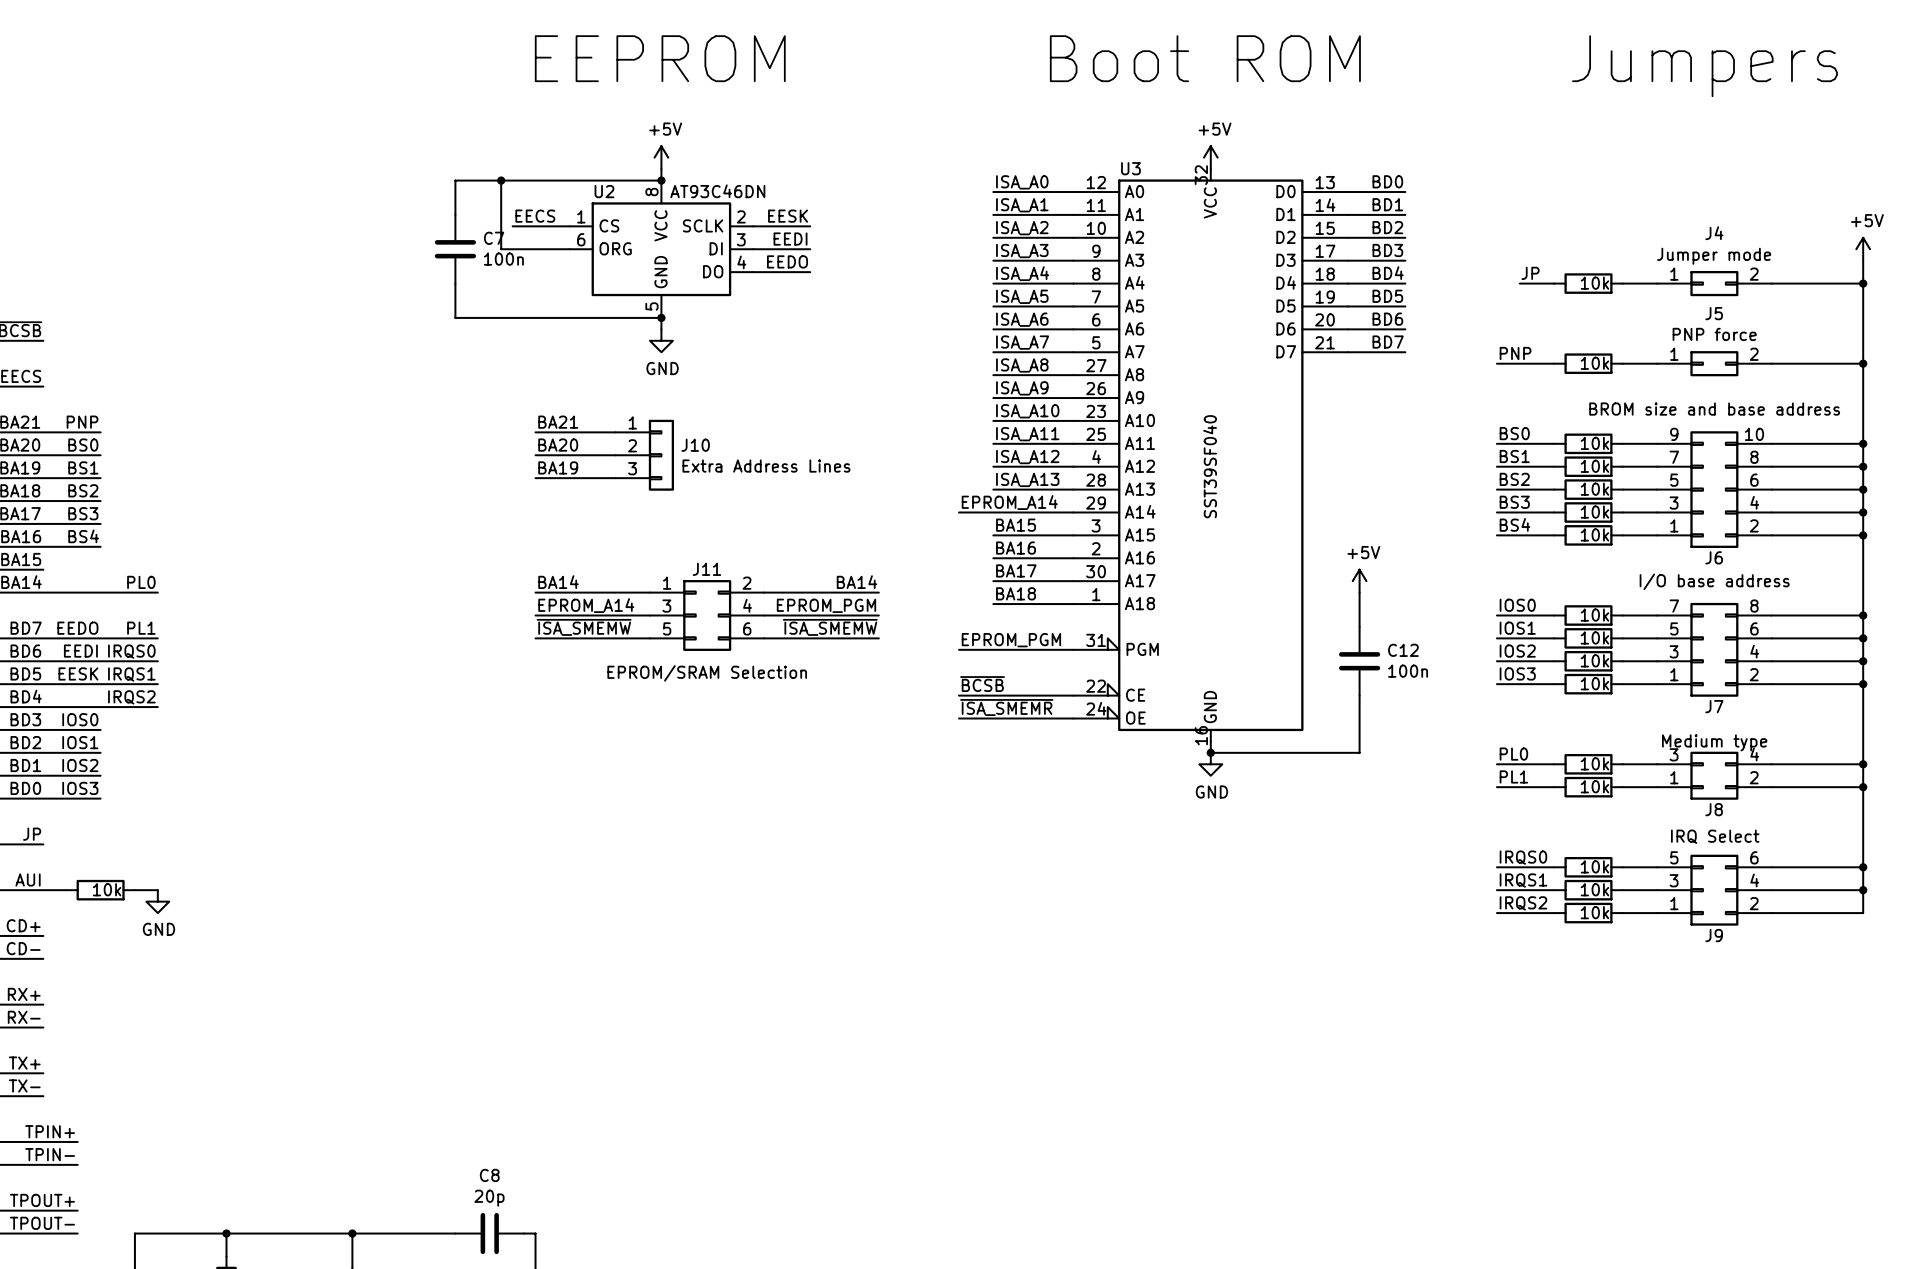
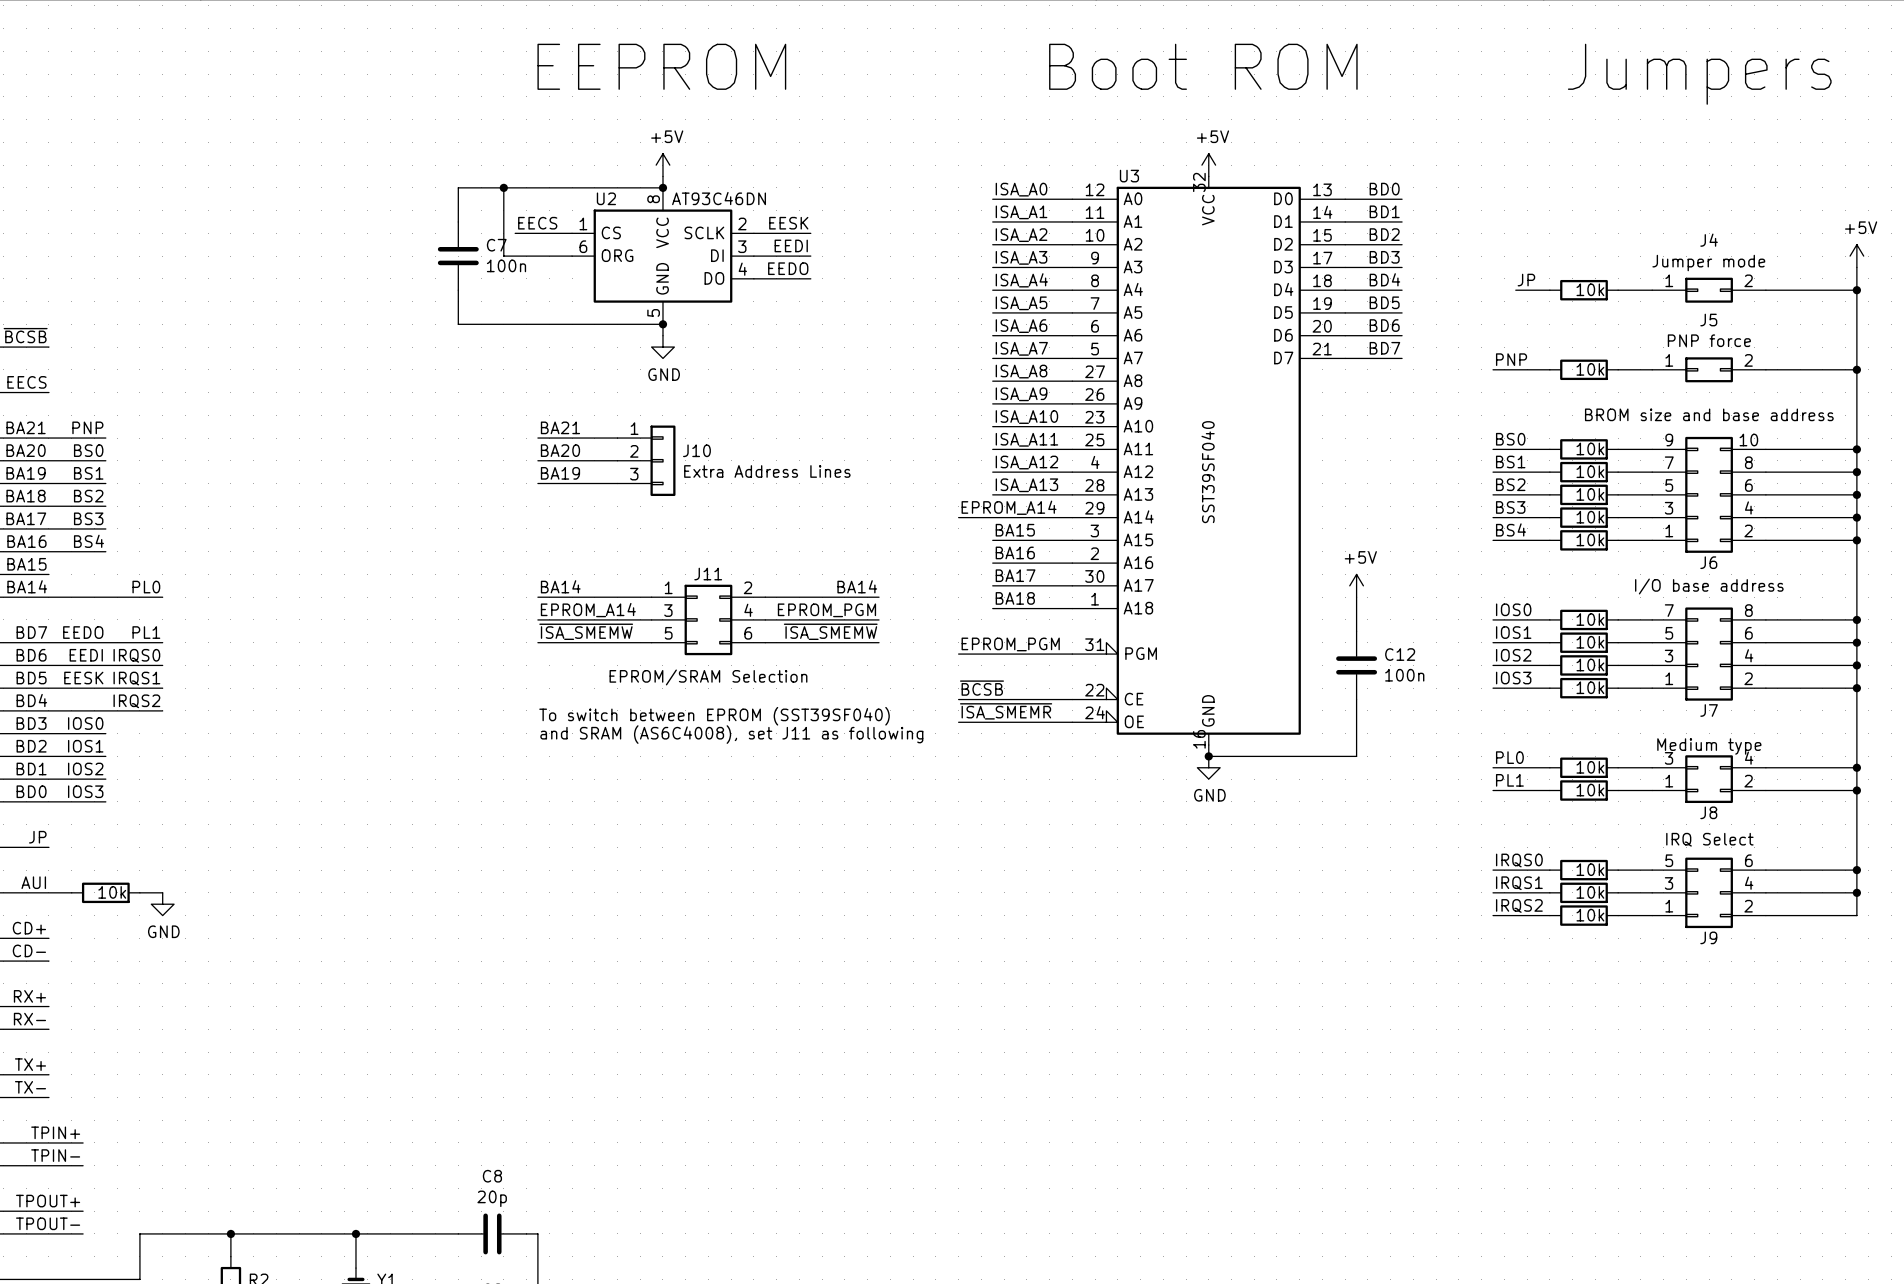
text: none -> To switch between EPROM (SST39SF040) (714, 716)
text: none -> and SRAM (AS6C4008), set J11 as following (731, 734)

